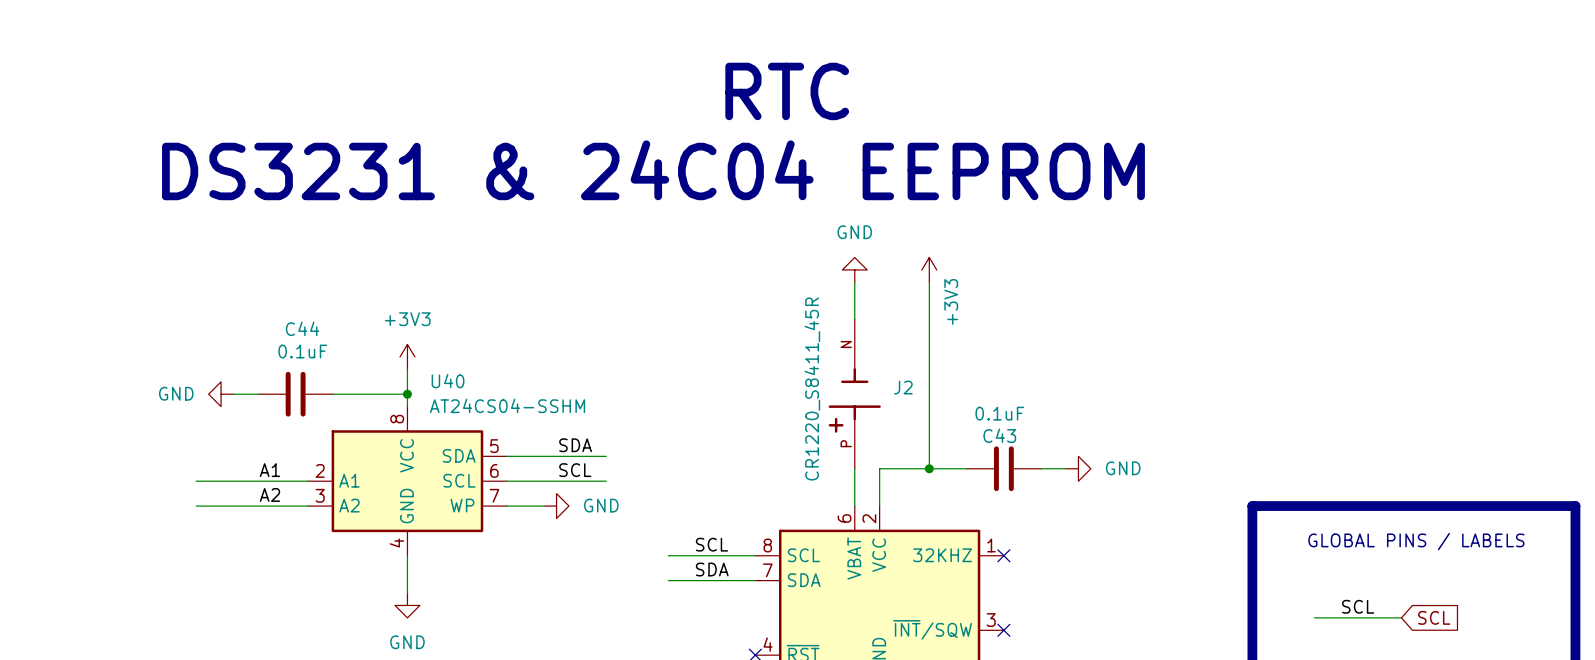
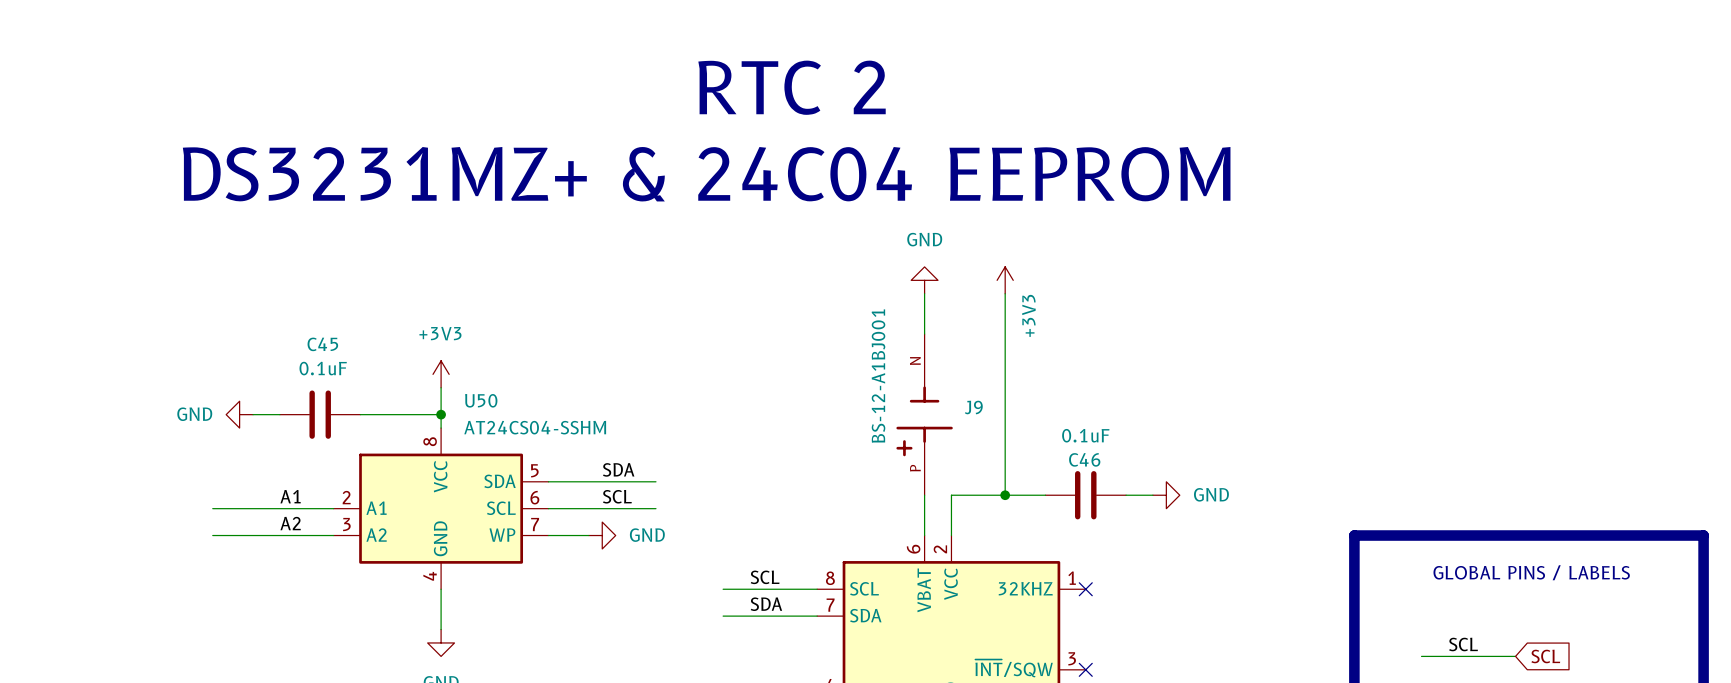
text: RTC (787, 91) -> RTC 2 (792, 87)
text: DS3231 & 24C04 EEPROM (653, 170) -> DS3231MZ+ & 24C04 EEPROM (706, 174)
C44 name: C44 (302, 328) -> C45 (322, 344)
U40 name: U40 (448, 381) -> U50 (481, 400)
J2 name: J2 (903, 387) -> J9 (973, 407)
J2 value: CR1220_S8411_45R (812, 388) -> BS-12-A1BJ001 (878, 376)
C43 name: C43 (999, 435) -> C46 (1084, 459)

